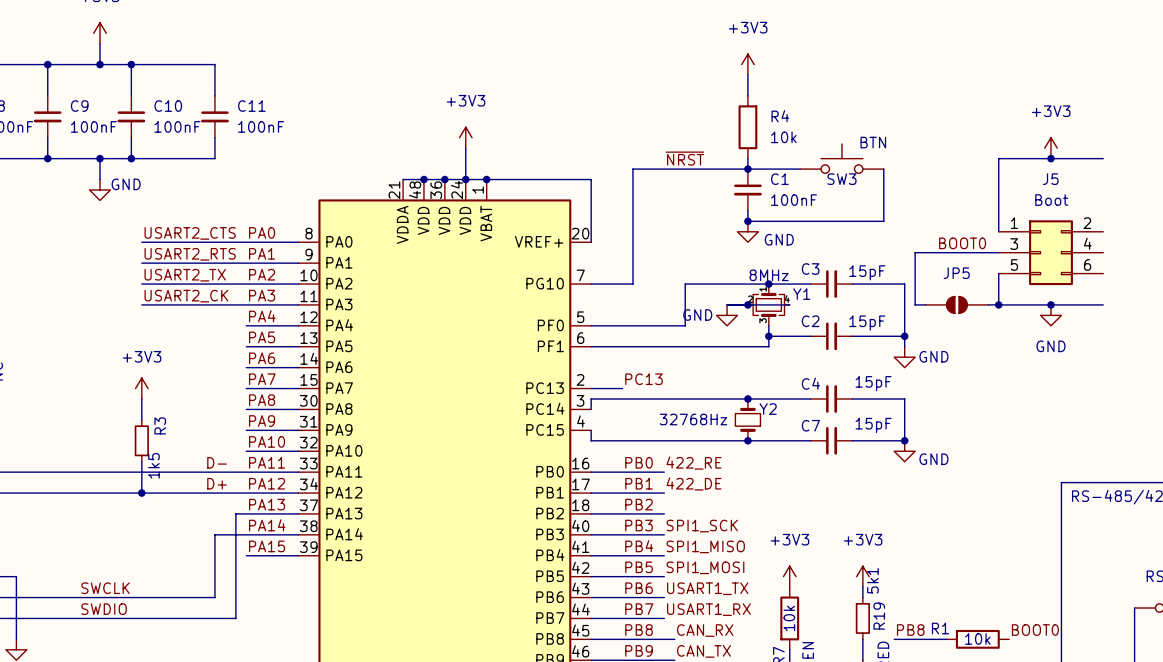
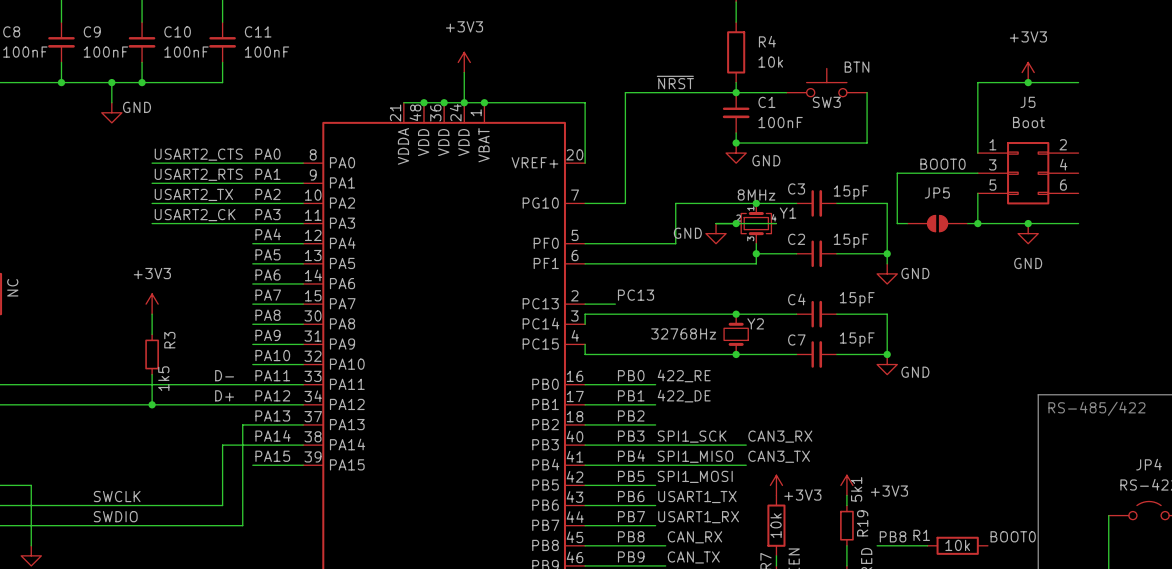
label: none -> CAN3_RX (780, 436)
wire: none -> (655, 445) (746, 445)
power symbol text position: +3V3 (789, 539) -> +3V3 (802, 495)
power symbol text position: +3V3 (863, 539) -> +3V3 (889, 491)
label: none -> CAN3_TX (779, 456)
wire: none -> (655, 465) (746, 465)

